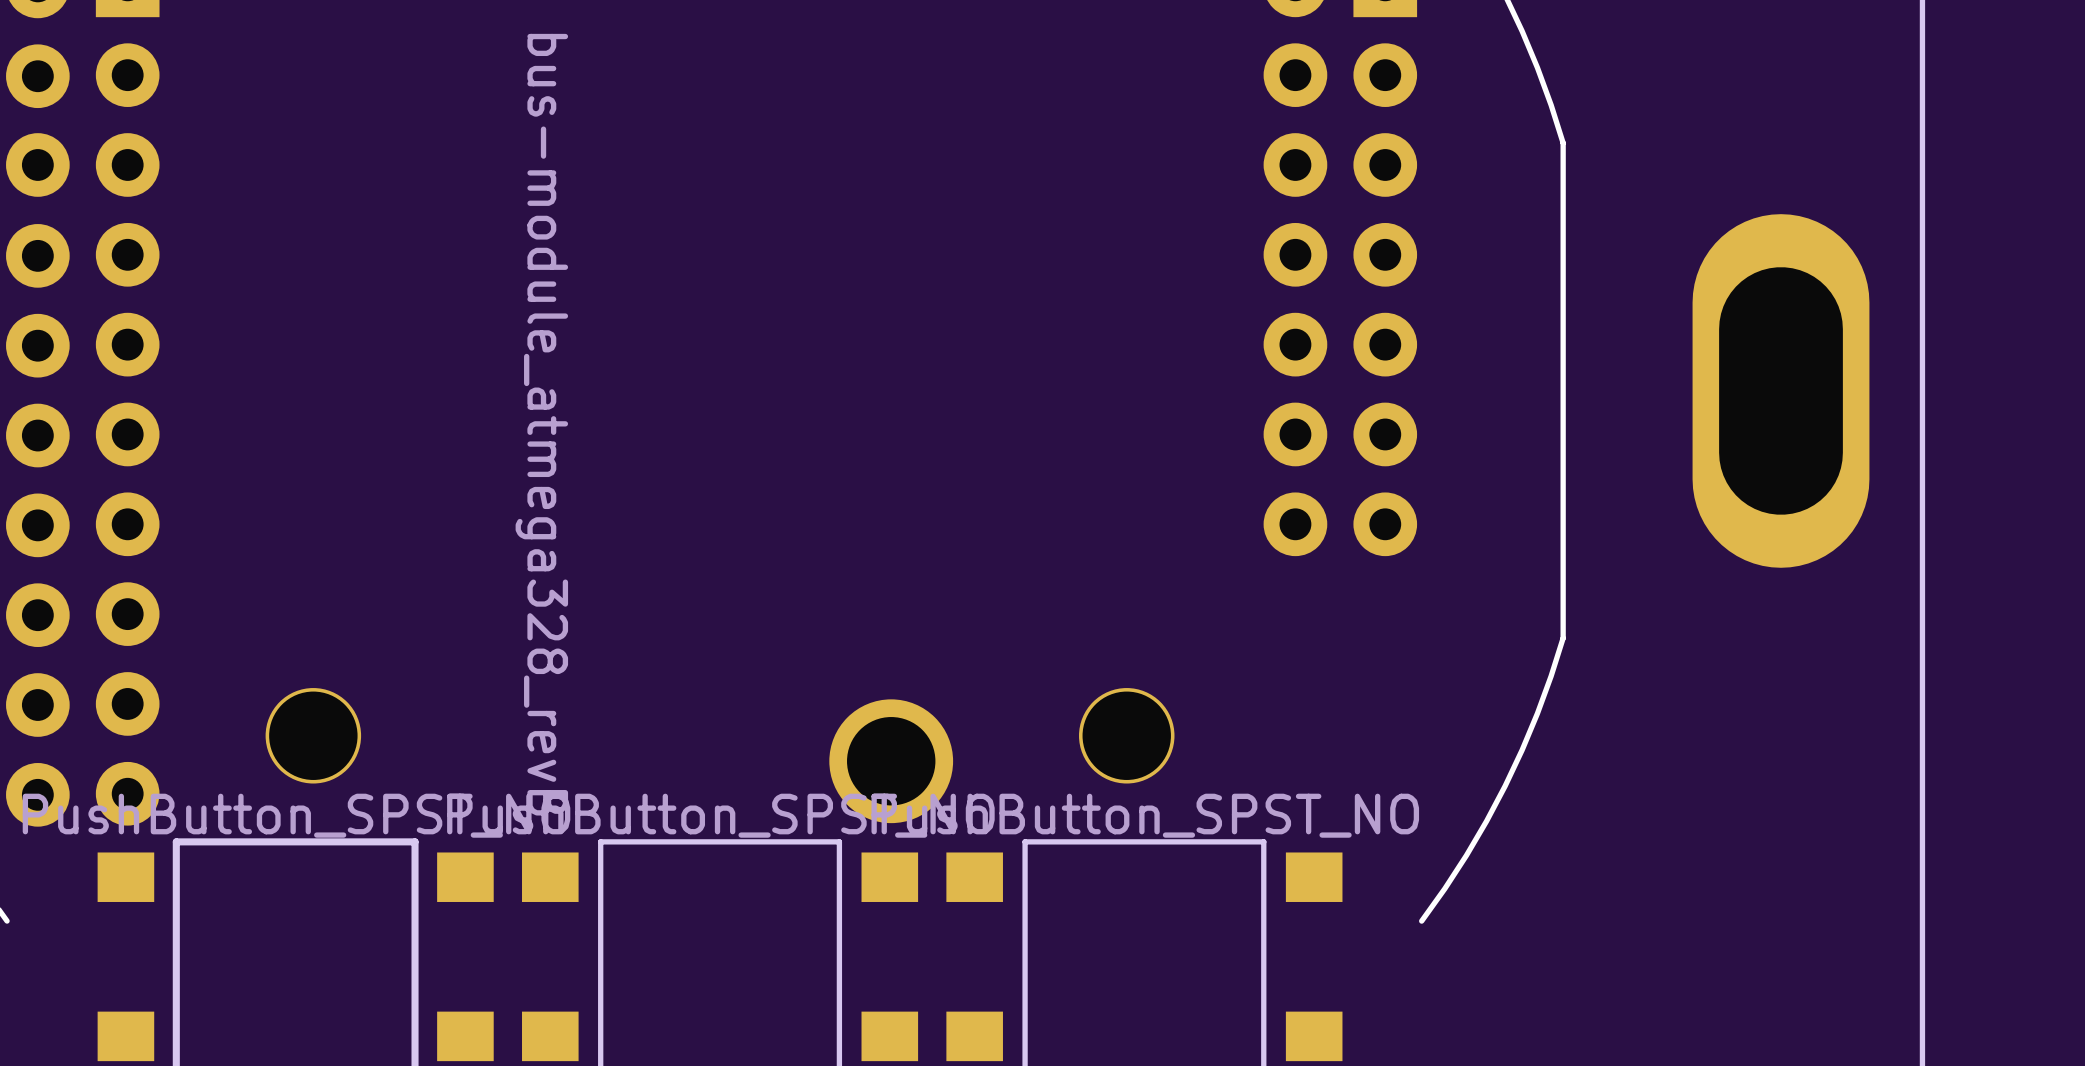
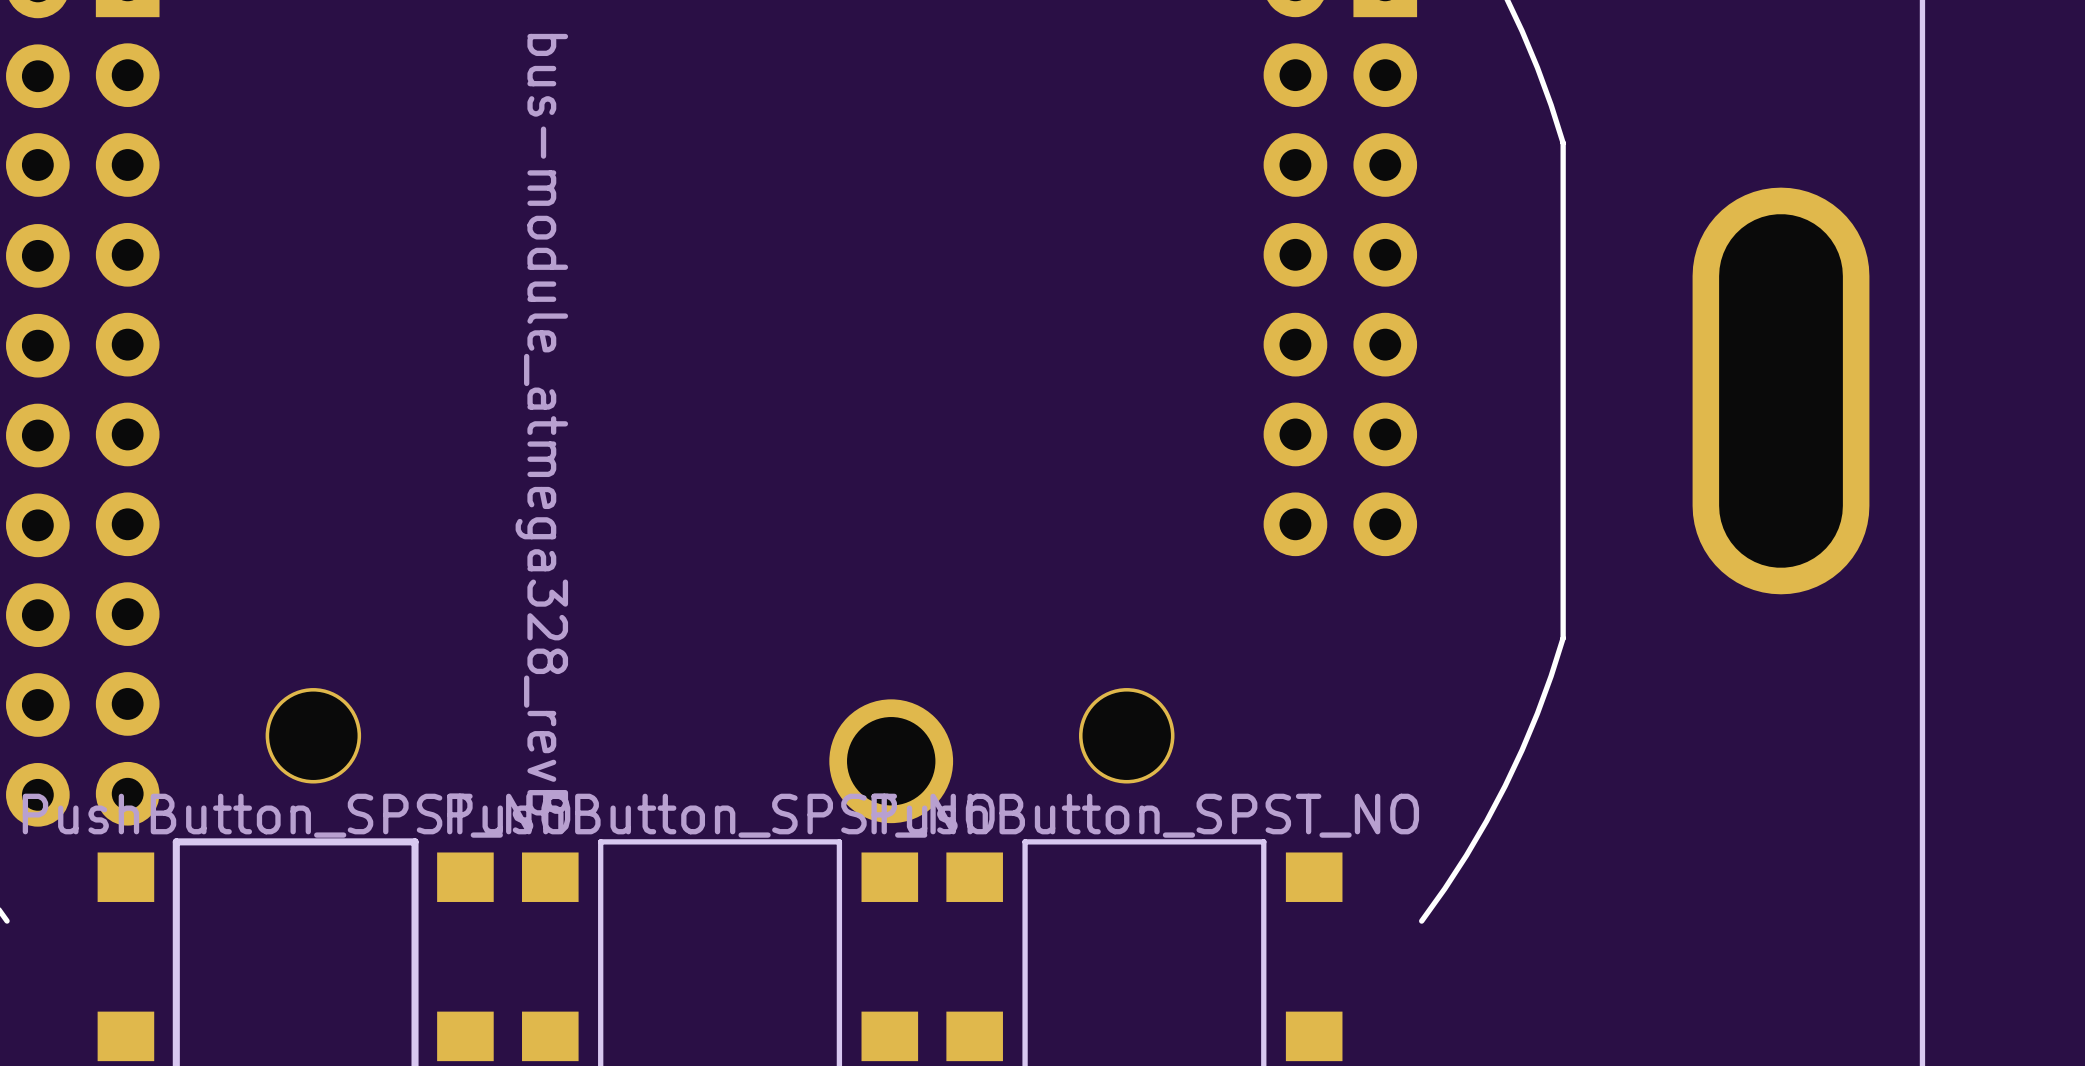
part footprint: [1692, 214, 1870, 568] -> [1692, 187, 1870, 595]

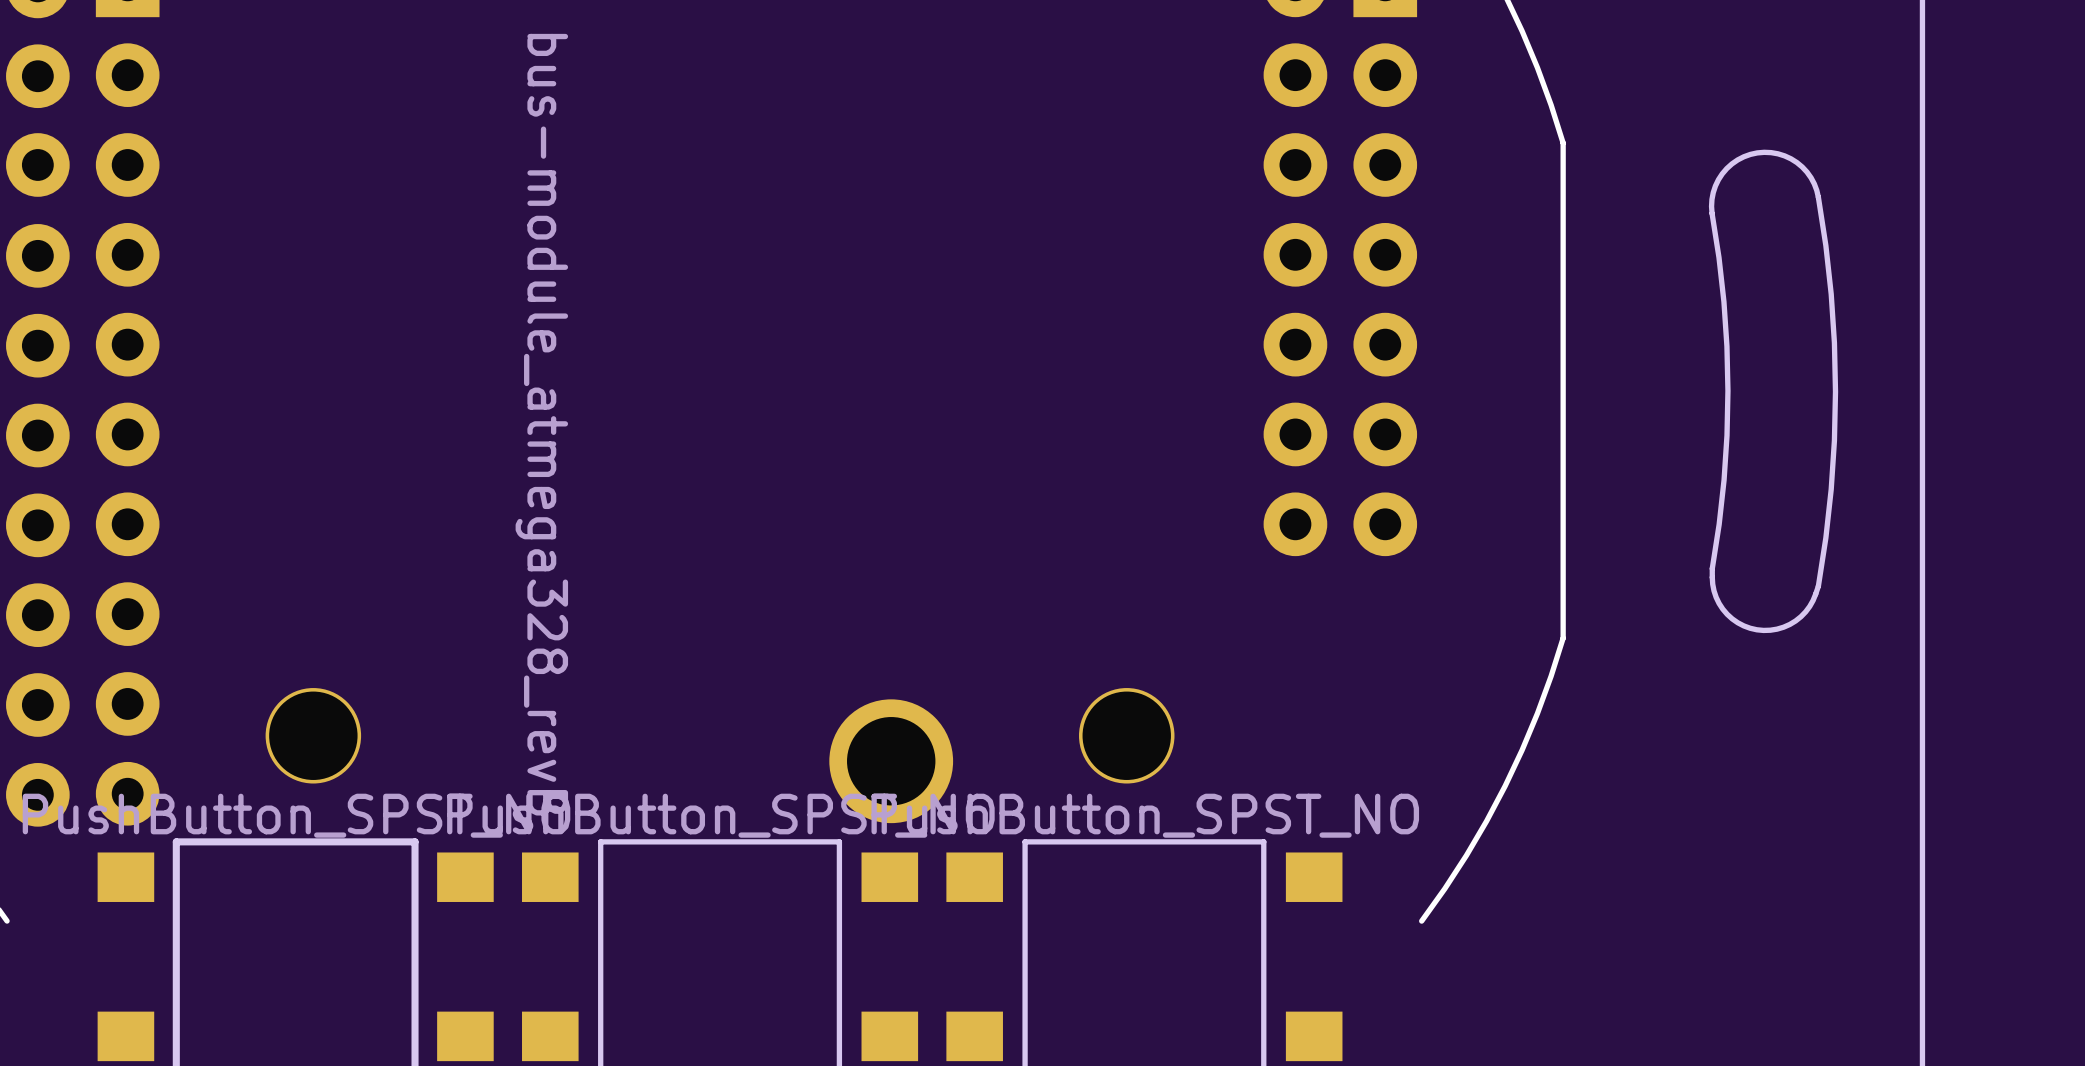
board edge: none -> (1818, 197) (1831, 294) (1835, 391) (1831, 489) (1825, 537) (1818, 586) (1813, 600) (1805, 611) (1795, 620) (1783, 627) (1770, 630) (1756, 629) (1737, 622) (1727, 614) (1719, 603) (1712, 584) (1712, 568) (1724, 480) (1727, 390) (1723, 301) (1712, 213) (1711, 199) (1718, 179) (1731, 163) (1743, 156) (1764, 152) (1784, 155) (1802, 167) (1814, 183) (1818, 197)
part: (1780, 390) -> none

